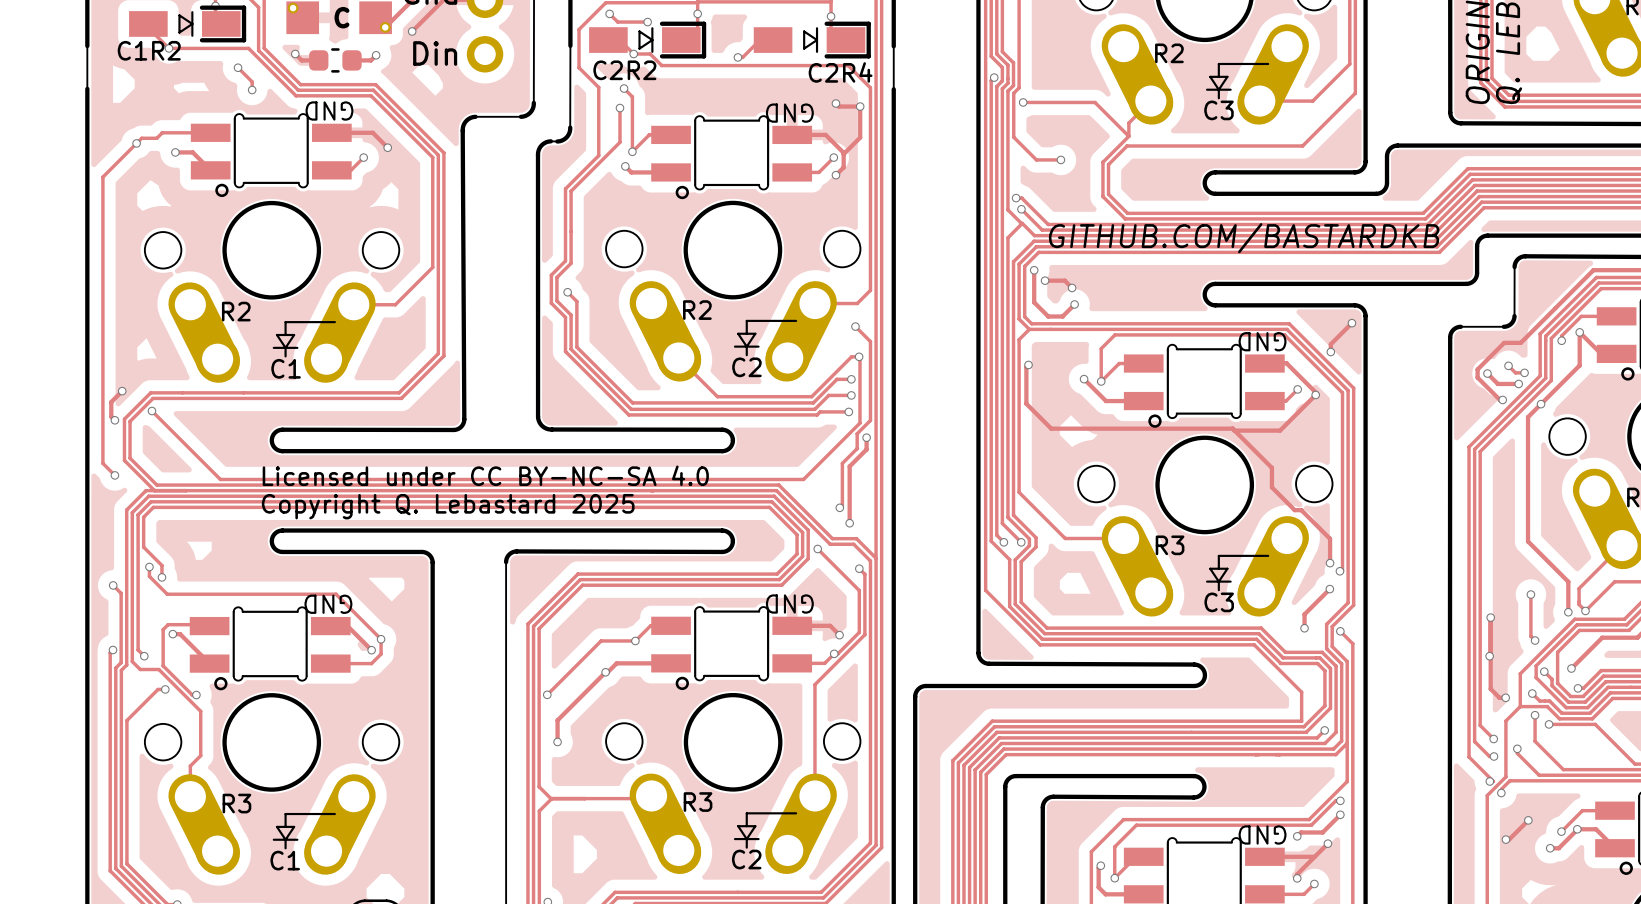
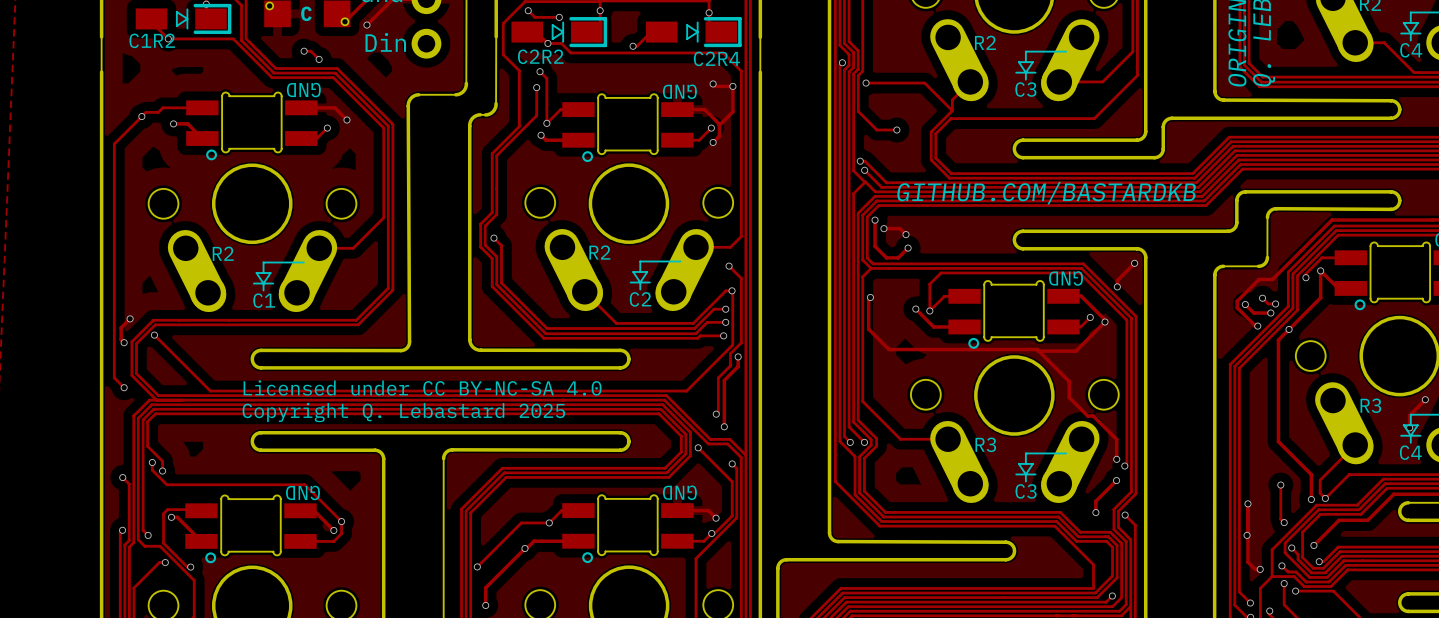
track: (295, 53) (301, 60) (318, 60) -> none
via: (295, 53) -> none
track: (376, 55) (370, 60) (352, 60) -> none
via: (376, 55) -> none
part: (335, 60) -> none
track: none -> (304, 51) (310, 51) (319, 59)
via: none -> (304, 51)
track: (238, 67) (252, 81) (252, 90) -> none
via: (238, 67) -> none
via: none -> (319, 59)
via: (252, 90) -> none

